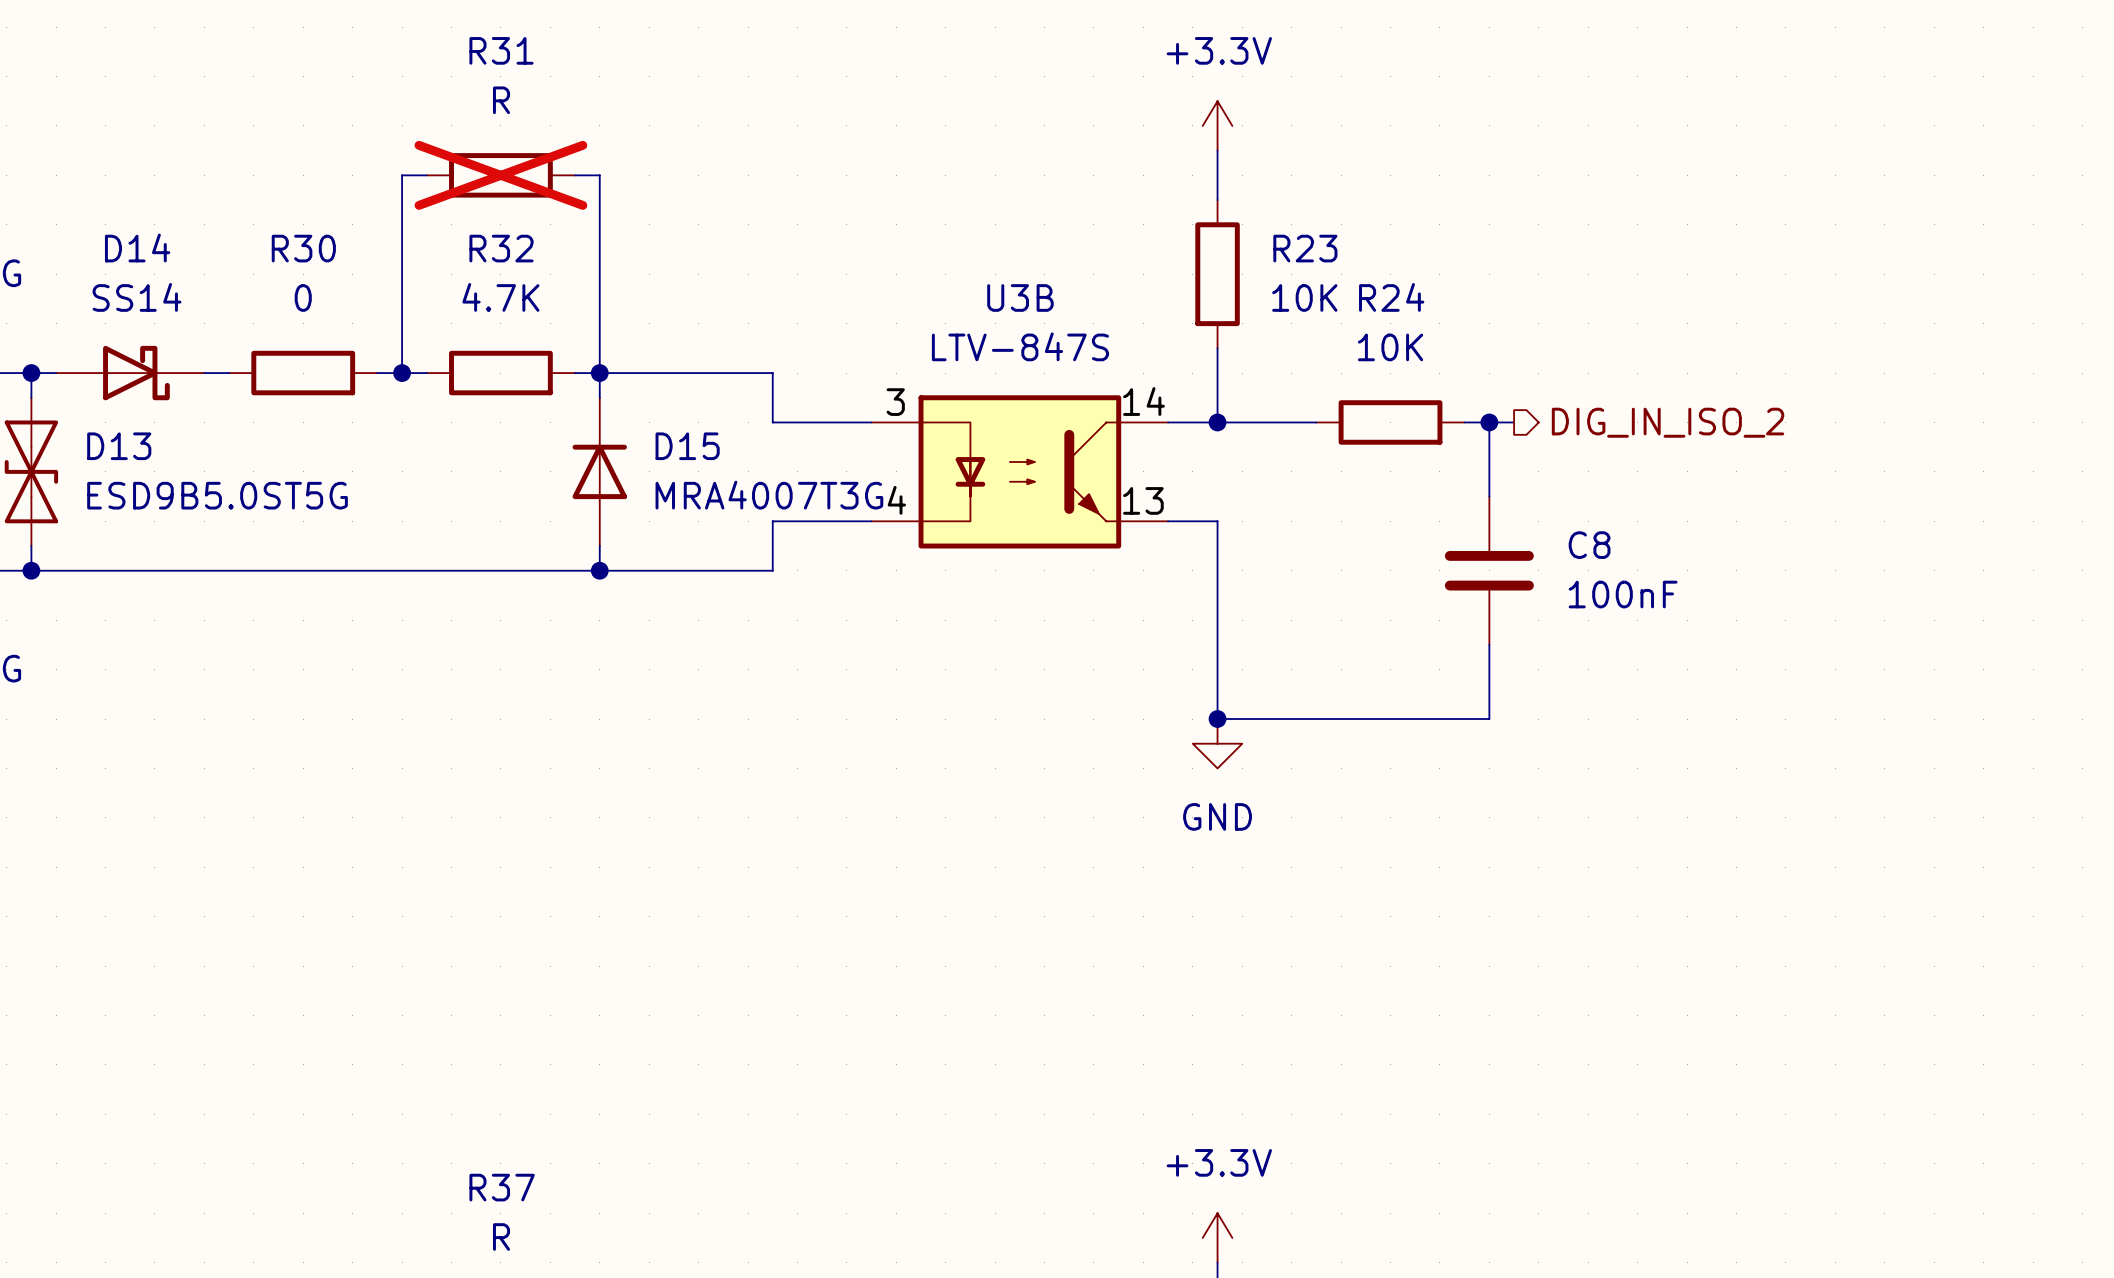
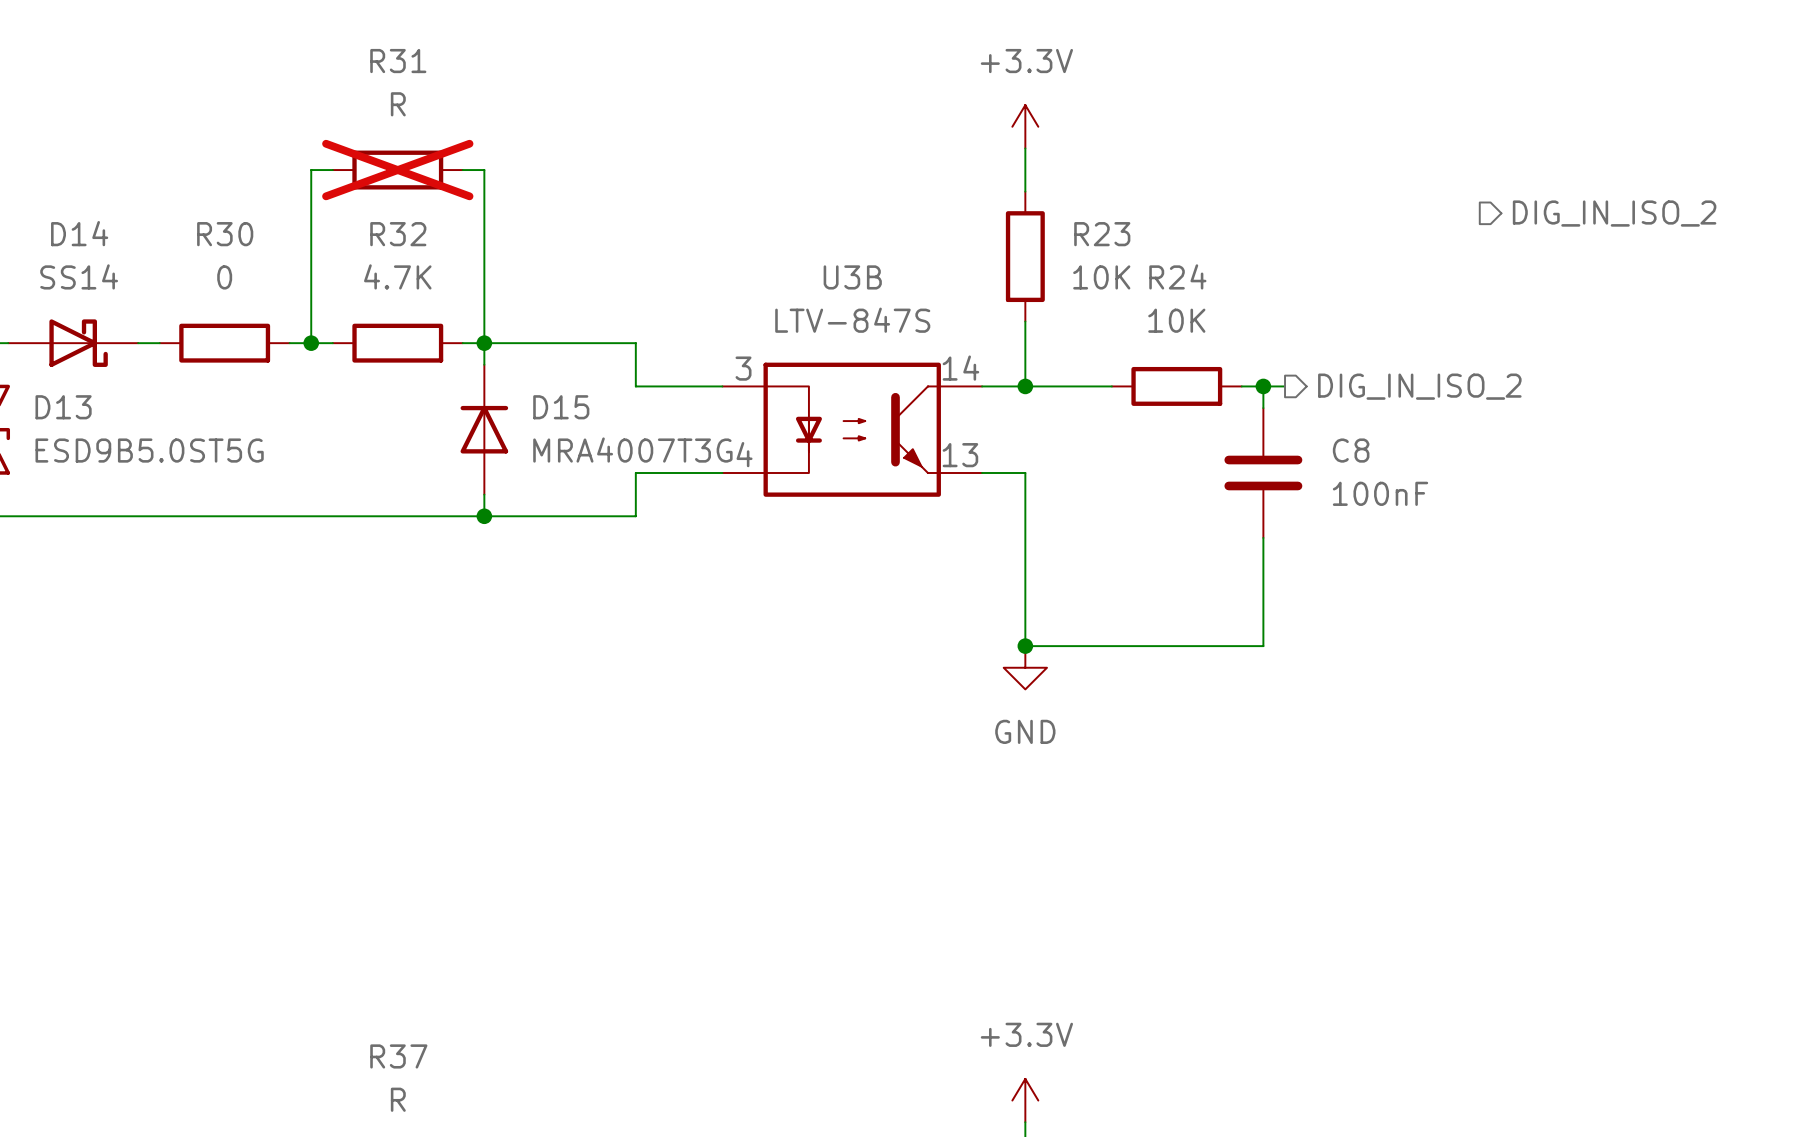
hierarchical label: none -> DIG_IN_ISO_2 (1614, 213)
C8 position: (1489, 570) -> (1263, 473)

